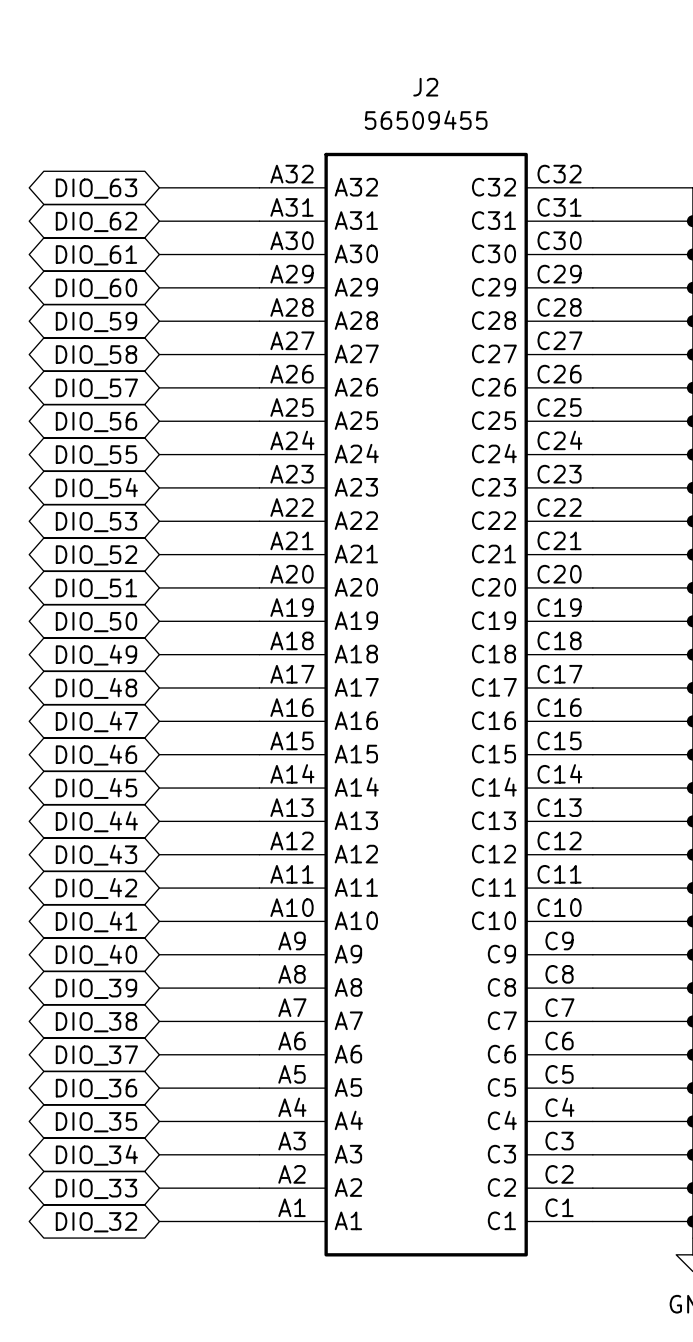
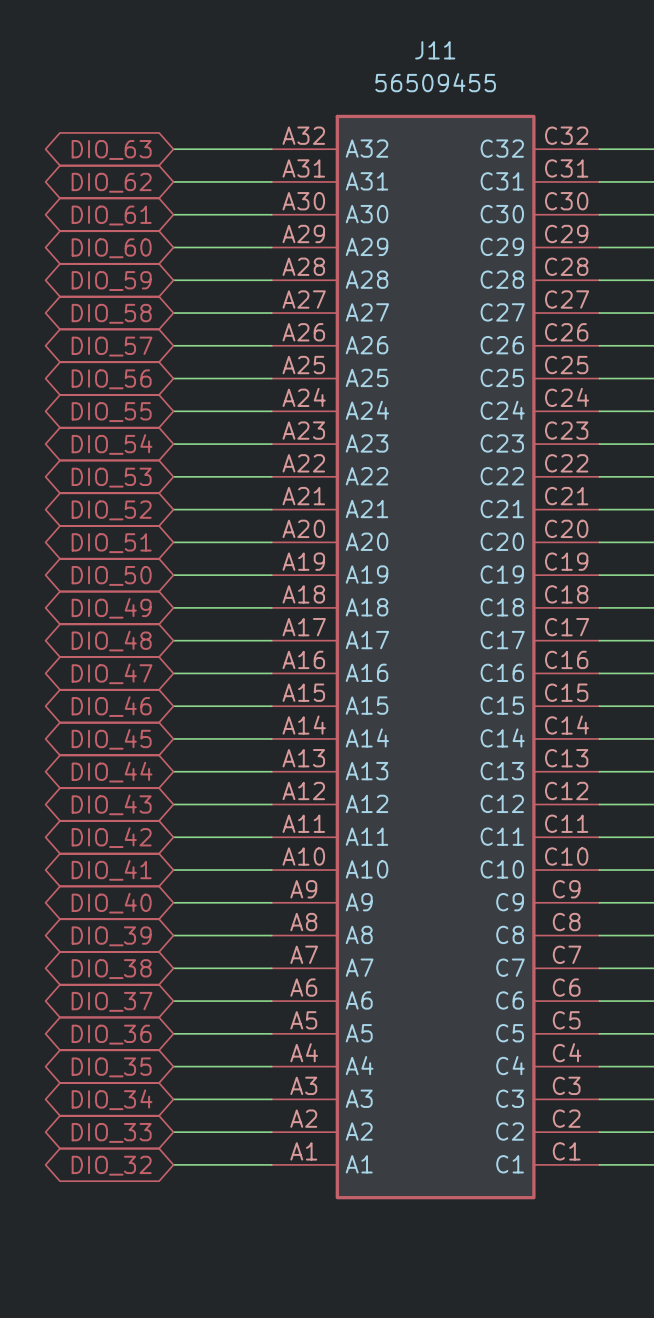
J2 name: J2 (425, 87) -> J11 (435, 50)

